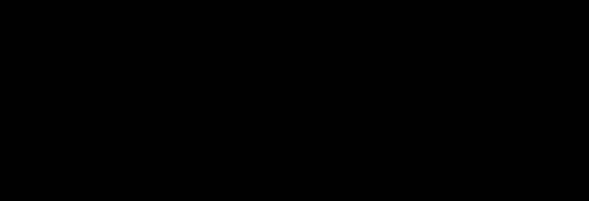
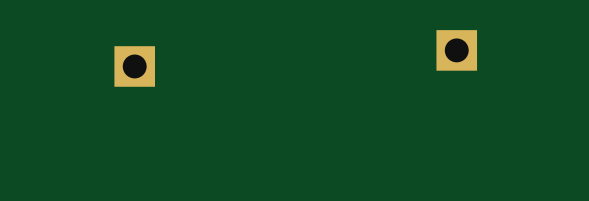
part: none -> (456, 50)
part: none -> (134, 66)

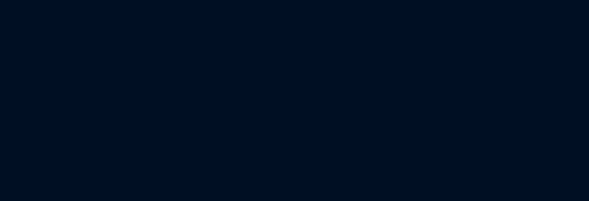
part: (456, 50) -> none
part: (134, 66) -> none

